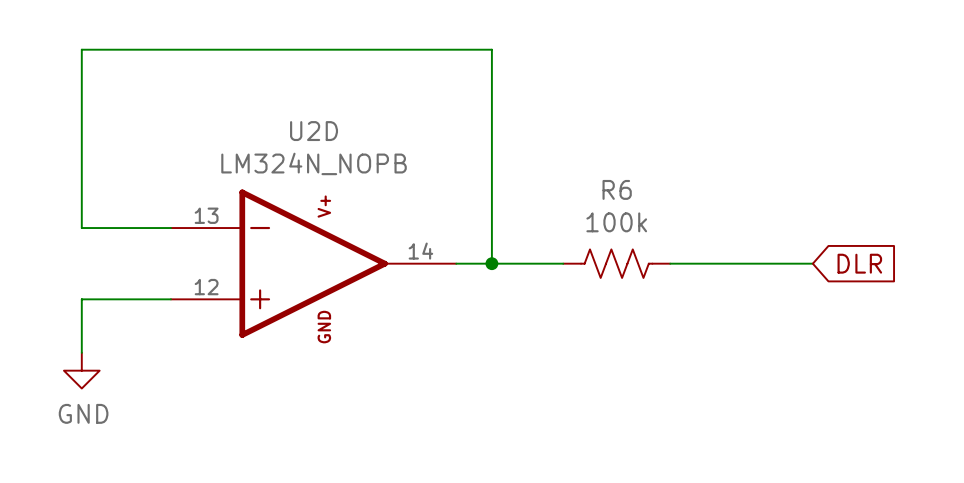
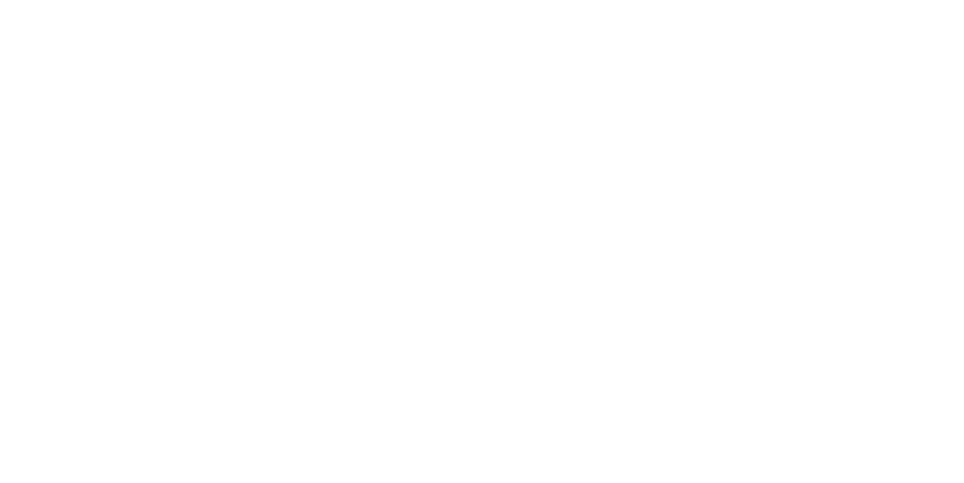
wire: (170, 228) (81, 228) (81, 49) (491, 49) (491, 263) -> none
U2D: LM324N_NOPB (313, 263) -> none
wire: (456, 263) (563, 263) -> none
junction: (491, 263) -> none
R6: 100k (616, 263) -> none
wire: (670, 263) (812, 263) -> none
global label: DLR (859, 263) -> none
wire: (170, 299) (81, 299) (81, 352) -> none
power symbol: GND (81, 370) -> none

